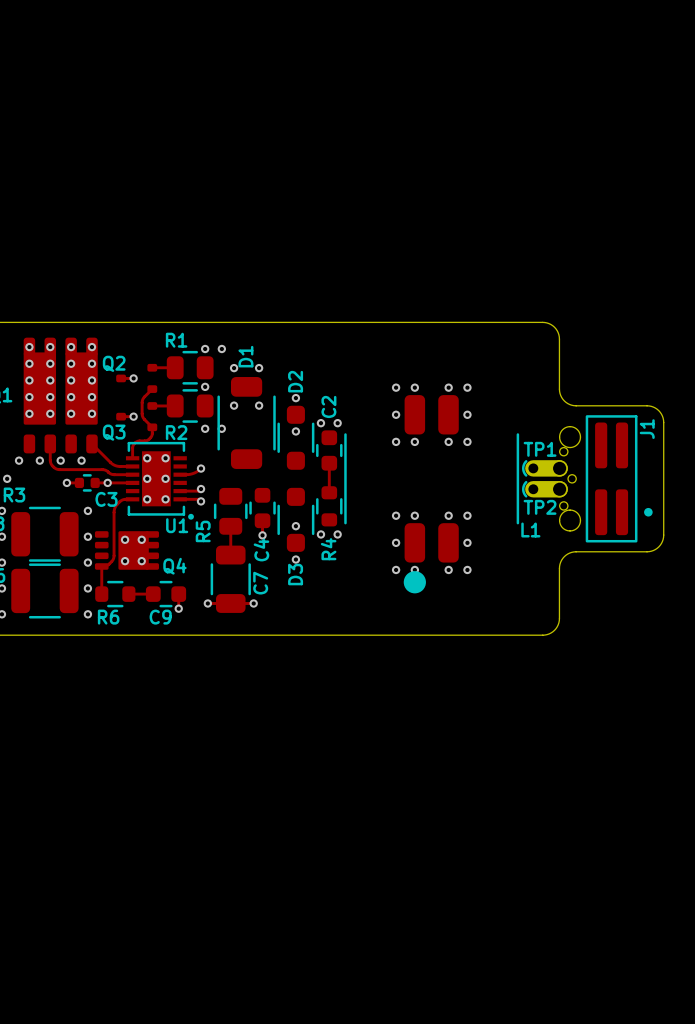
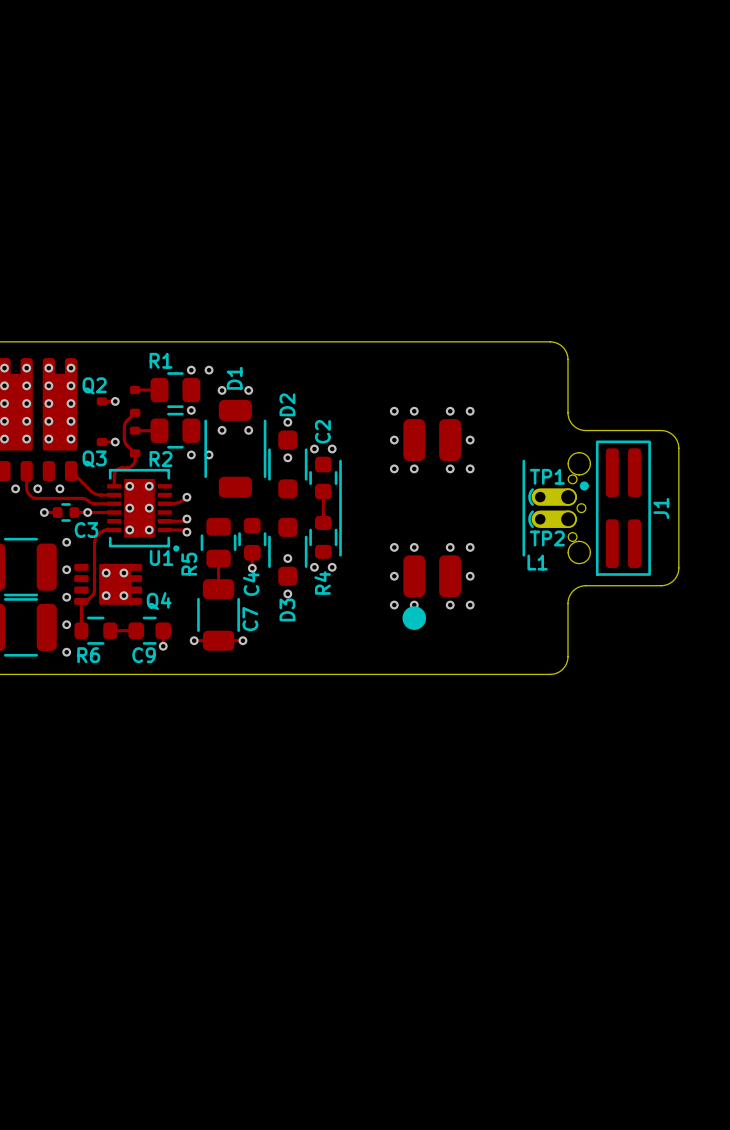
J1 footprint: [585, 415, 653, 543] -> [579, 440, 651, 576]
J1 name position: J1 (647, 429) -> J1 (661, 508)

